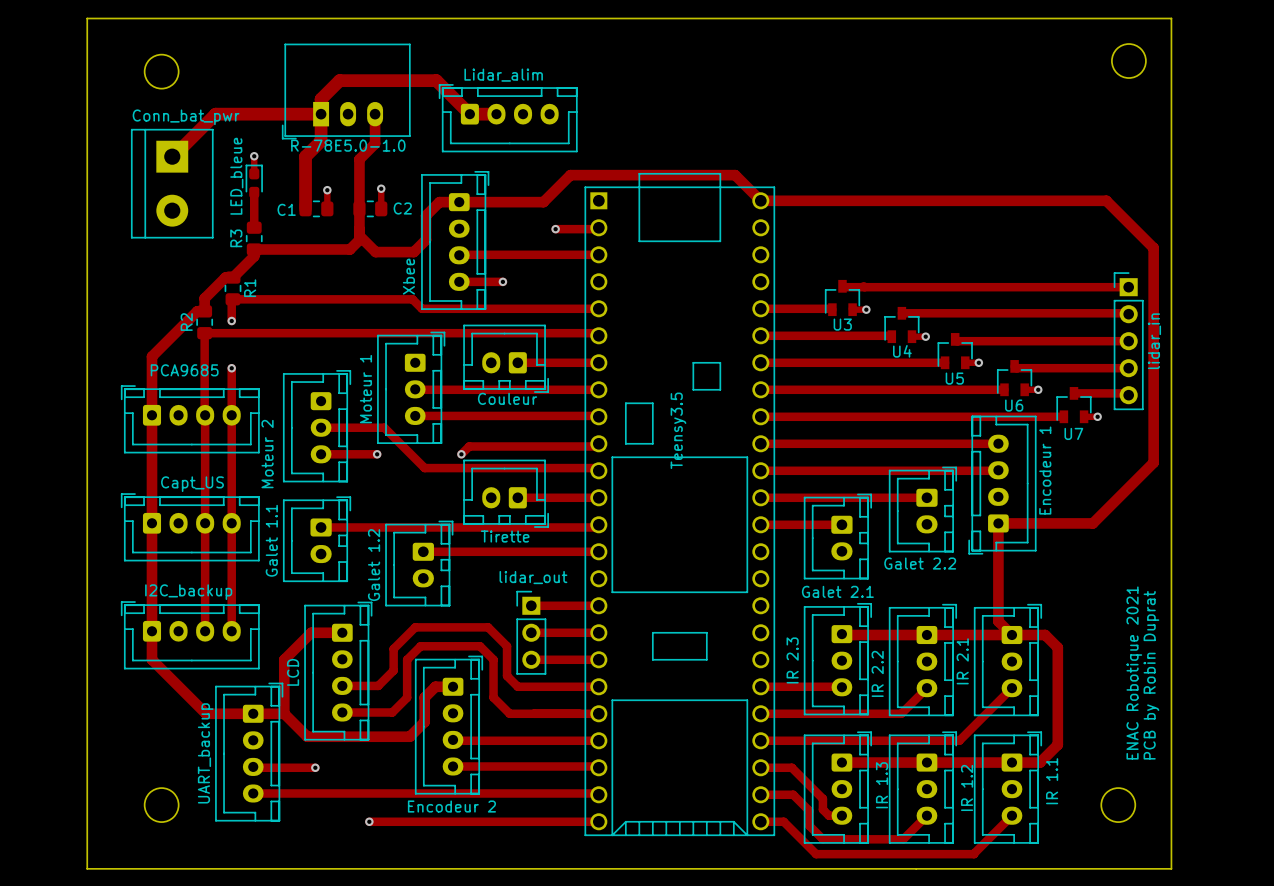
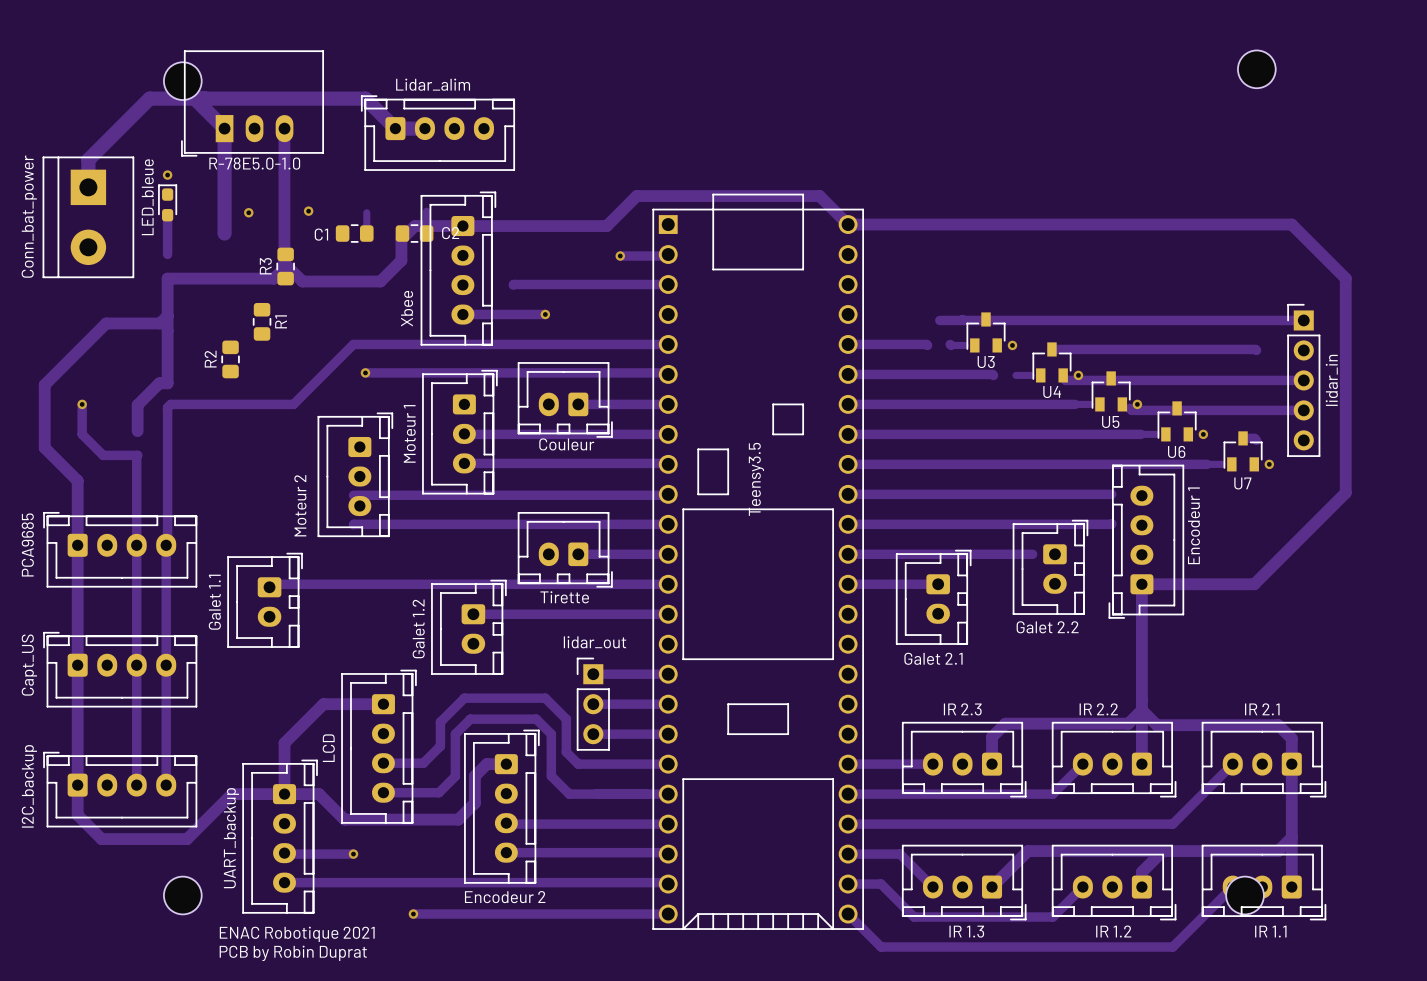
board edge: (87, 18) (1171, 18) (1171, 868) (87, 868) (87, 18) -> none
track: none -> (194, 98) (224, 128) (224, 233)
part position: (346, 91) -> (252, 103)
track: none -> (284, 128) (284, 268) (273, 278) (167, 278) (167, 383) (159, 383) (137, 405) (137, 431)
track: (321, 114) (215, 114) (172, 156) -> none
track: (375, 114) (375, 143) (359, 159) (359, 240) (350, 249) (254, 249) (254, 256) (233, 277) (225, 277) (204, 298) (204, 311) (197, 311) (151, 356) (151, 659) (206, 713) -> (167, 315) (160, 323) (106, 323) (44, 384) (44, 447) (77, 480) (77, 815) (101, 839) (187, 839) (232, 794)
track: none -> (424, 128) (395, 128) (365, 98) (149, 98) (88, 159) (88, 187)
track: (496, 114) (469, 114) (436, 80) (339, 80) (321, 99) (321, 141) (305, 156) (305, 208) -> none
part position: (508, 118) -> (437, 133)
via: none -> (167, 175)
via: (254, 156) -> none
part position: (254, 181) -> (167, 202)
part: Conn_bat_pwr (172, 183) -> none
via: none -> (308, 211)
via: (381, 188) -> none
via: none -> (248, 212)
via: (327, 190) -> none
track: (254, 192) (254, 227) -> (167, 215) (167, 254)
part: none -> Conn_bat_power (88, 217)
track: (1106, 200) (1153, 248) (1153, 462) (1092, 523) (998, 523) (998, 621) (1011, 635) -> (1231, 224) (1291, 224) (1345, 278) (1345, 492) (1254, 584) (1141, 584) (1141, 764)
track: (439, 202) (426, 215) (426, 239) (413, 252) (375, 252) (359, 235) -> (491, 226) (414, 226) (401, 239) (401, 260) (380, 281) (302, 281) (284, 263)
part position: (455, 240) -> (458, 268)
track: none -> (462, 314) (545, 314)
track: (459, 281) (502, 281) -> none
via position: (502, 281) -> (545, 314)
U3 position: (842, 297) -> (986, 332)
track: (421, 308) (412, 299) (233, 299) (231, 321) -> (471, 344) (353, 344) (293, 404) (170, 404) (167, 407)
via: (866, 309) -> none
via: none -> (1012, 345)
track: (901, 313) (944, 313) -> (1256, 320) (1303, 320)
via: (231, 321) -> none
U4 position: (901, 324) -> (1051, 362)
via: none -> (365, 372)
track: (597, 334) (204, 333) (205, 631) -> (666, 372) (365, 372)
via: (925, 336) -> none
via: none -> (1078, 375)
track: none -> (1256, 380) (1303, 380)
part position: (1128, 341) -> (1303, 380)
U5 position: (955, 351) -> (1111, 391)
track: none -> (82, 404) (82, 434) (103, 455) (137, 455) (136, 785)
via: none -> (82, 404)
track: none -> (1052, 404) (1075, 404)
via: (978, 362) -> none
via: none -> (1137, 404)
track: none -> (167, 407) (166, 785)
track: (231, 368) (231, 631) -> none
via: (231, 368) -> none
part value rotation: 0° (184, 370) -> 90° counterclockwise (27, 544)
part value position: PCA9685 (184, 370) -> PCA9685 (27, 544)
U6 position: (1014, 378) -> (1177, 421)
track: none -> (1118, 434) (1141, 434)
via: (1038, 389) -> none
via: none -> (1203, 434)
track: (1073, 393) (1116, 393) -> (1256, 410) (1303, 410)
U7 position: (1073, 405) -> (1243, 451)
track: none -> (1184, 464) (1207, 464)
via: (1097, 416) -> none
via: none -> (1269, 464)
part position: (190, 419) -> (120, 549)
track: (321, 427) (384, 427) (424, 468) (596, 468) (598, 470) -> (353, 524) (668, 524)
track: (597, 444) (596, 446) (469, 446) (461, 454) -> (667, 495) (353, 495)
track: (321, 454) (377, 454) -> none
via: (377, 454) -> none
via: (461, 454) -> none
part value rotation: 0° (192, 484) -> 90° counterclockwise (29, 665)
part value position: Capt_US (192, 484) -> Capt_US (29, 665)
part position: (1002, 485) -> (1146, 541)
part position: (922, 509) -> (1050, 567)
track: (598, 524) (596, 527) (321, 527) -> (668, 584) (272, 584) (269, 587)
part position: (190, 527) -> (120, 669)
part position: (317, 539) -> (265, 600)
part value rotation: 0° (188, 592) -> 90° counterclockwise (29, 786)
track: (311, 632) (284, 659) (284, 713) -> (348, 704) (323, 704) (284, 743) (284, 794)
track: (841, 634) (1045, 635) (1057, 647) (1057, 744) (1040, 762) (841, 762) -> none
part position: (190, 635) -> (120, 789)
part rotation: 0° (837, 659) -> 90° clockwise (964, 759)
part rotation: 0° (922, 660) -> 90° clockwise (1114, 759)
part position: (922, 660) -> (1114, 759)
part rotation: 0° (1007, 660) -> 90° clockwise (1264, 759)
part position: (1007, 660) -> (1264, 759)
text: ENAC Robotique 2021 (1134, 672) -> none
text: PCB by Robin Duprat (1151, 675) -> none
track: none -> (992, 764) (992, 737) (1005, 723) (1128, 723) (1141, 710) (1156, 725) (1278, 725) (1291, 738) (1291, 887)
track: (926, 688) (901, 713) -> (1082, 764) (1052, 794) (1004, 794)
track: (1011, 688) (959, 740) -> (1232, 764) (1172, 824) (1068, 824)
track: none -> (1291, 837) (1278, 851) (1027, 851) (992, 887)
track: none -> (1162, 851) (1141, 872) (1141, 887)
track: (791, 767) (822, 798) (822, 809) (829, 815) (841, 815) -> (882, 854) (900, 854) (933, 887)
part value: IR 1.1 (1052, 781) -> IR 1.2 (1113, 931)
part rotation: 0° (837, 787) -> 90° clockwise (964, 882)
part: IR 1.2 (922, 787) -> none
part rotation: 0° (1007, 787) -> 90° clockwise (1114, 882)
part: none -> IR 1.1 (1264, 882)
track: (790, 794) (793, 794) (809, 810) (809, 825) (822, 839) (903, 839) (926, 815) -> (881, 884) (914, 917) (1052, 917) (1082, 887)
track: (1011, 815) (974, 854) (816, 854) (783, 821) (760, 821) -> (1232, 887) (1172, 947) (881, 947) (848, 914)
text: none -> ENAC Robotique 2021 (297, 934)
text: none -> PCB by Robin Duprat (293, 953)

